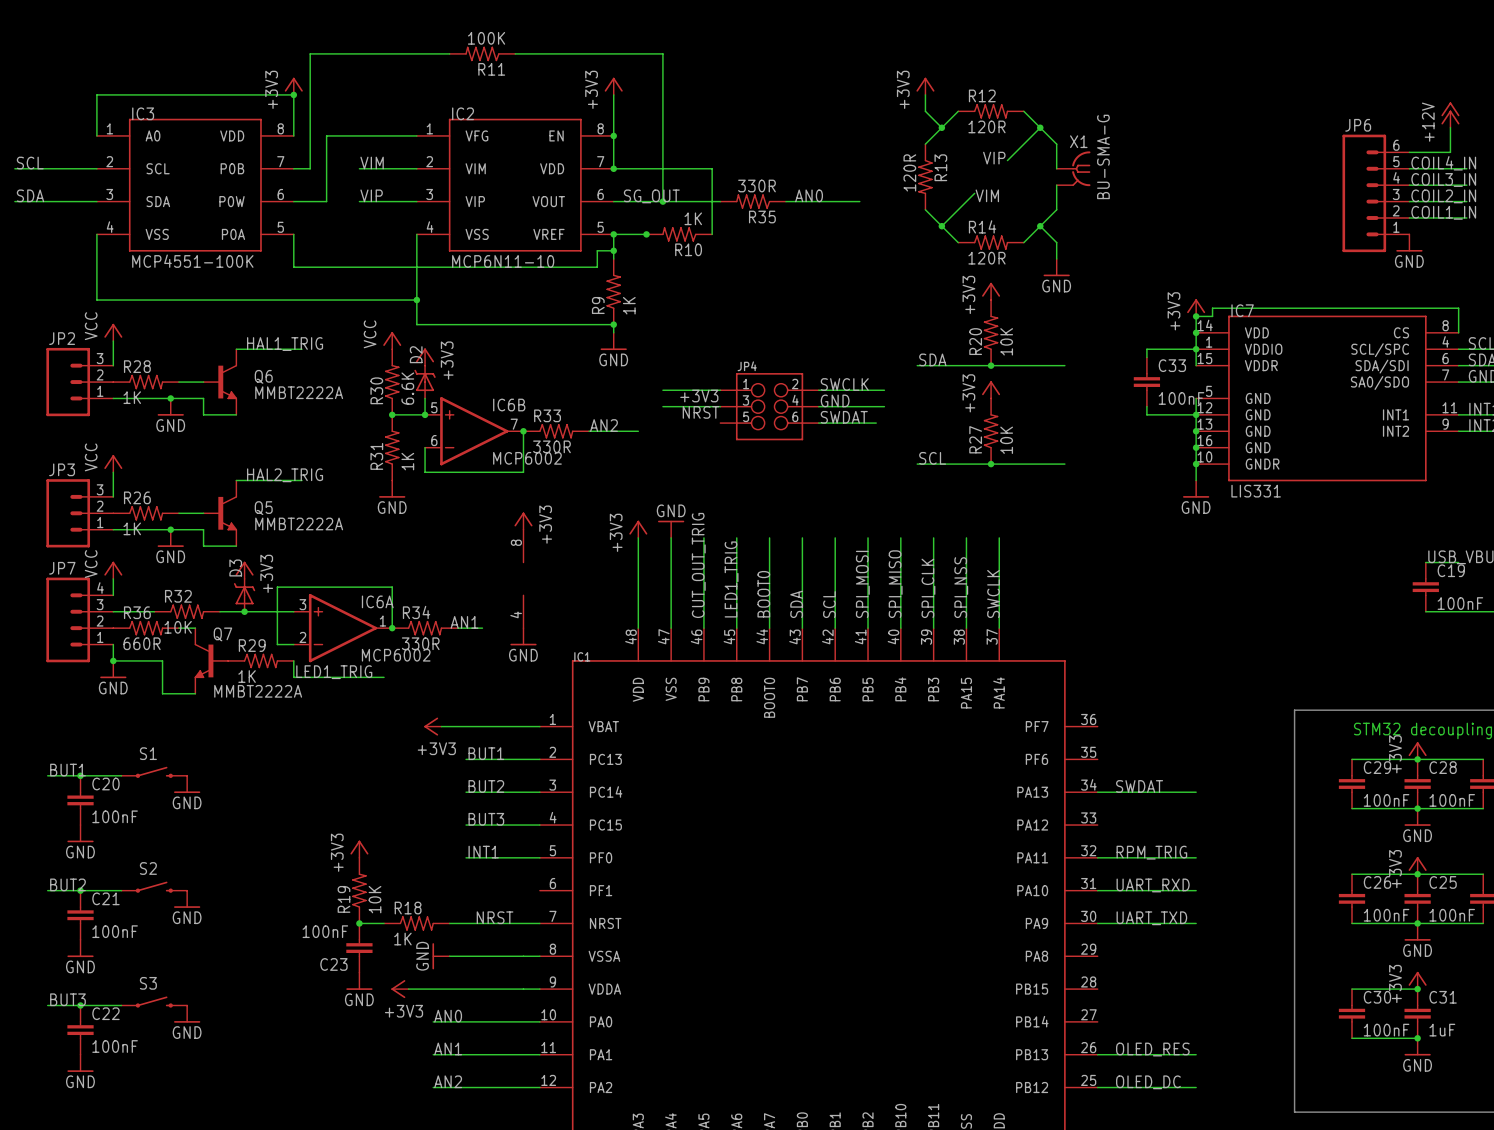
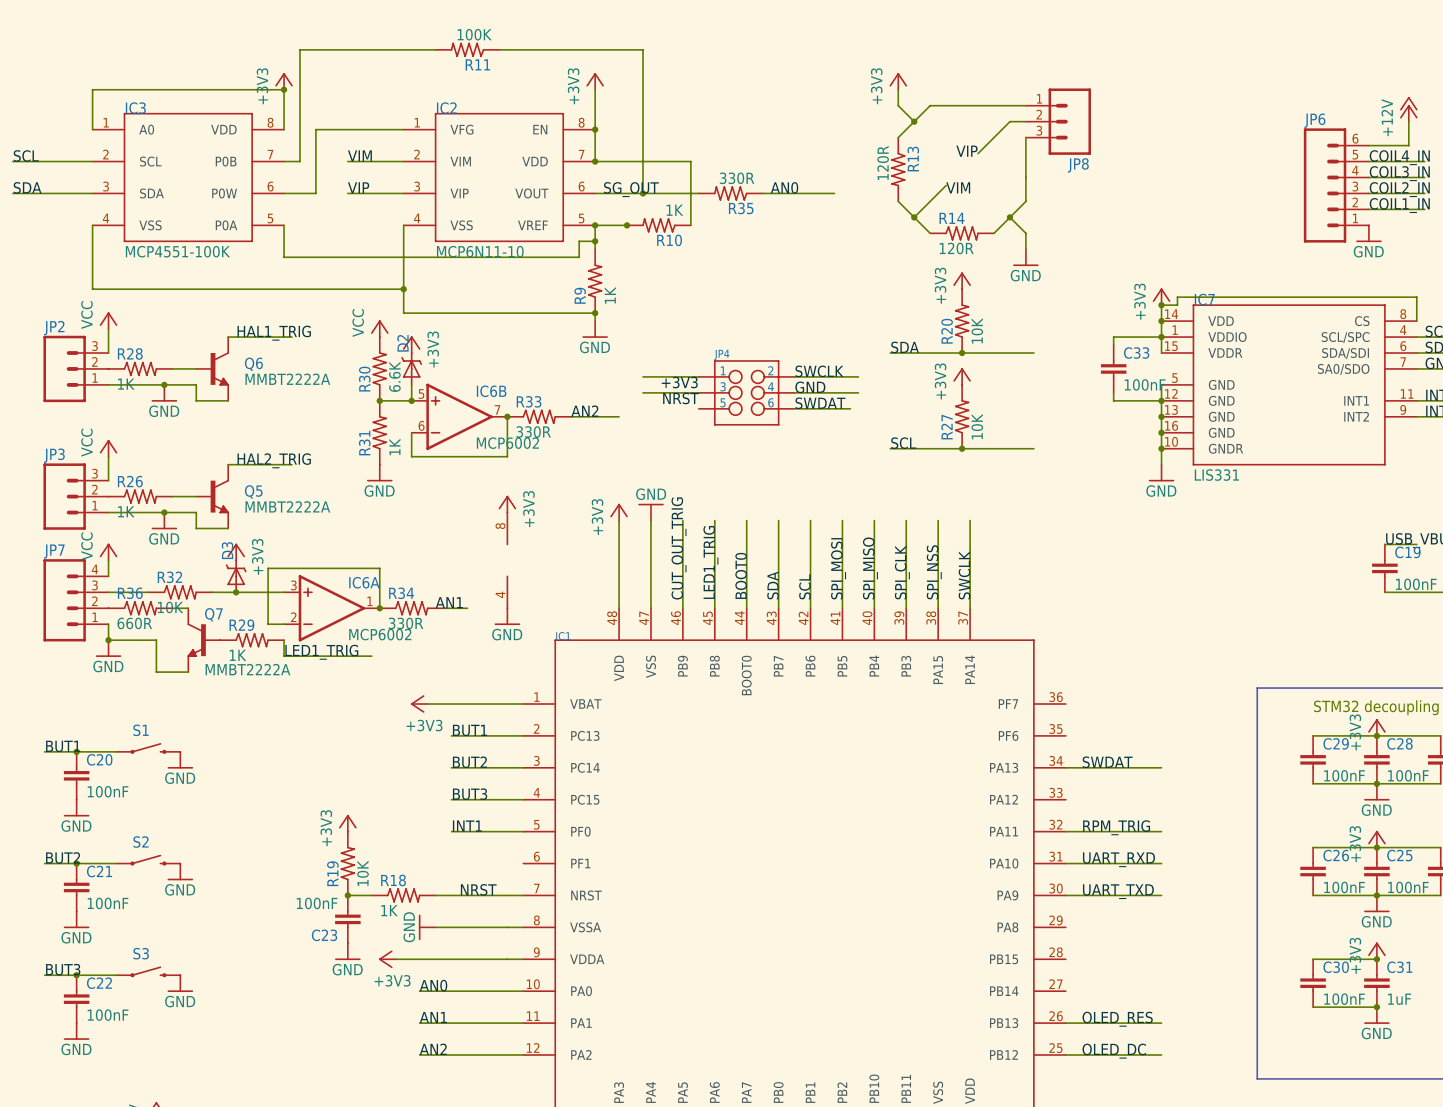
wire: none -> (930, 105) (1025, 105)
R12: 120R (991, 111) -> none
wire: (1023, 111) (1056, 144) -> none
wire: none -> (1009, 121) (1025, 121)
junction: (1040, 127) -> none
JP8: none -> (1058, 121)
wire: none -> (1025, 161) (1025, 177)
X1: BU-SMA-G (1073, 168) -> none

